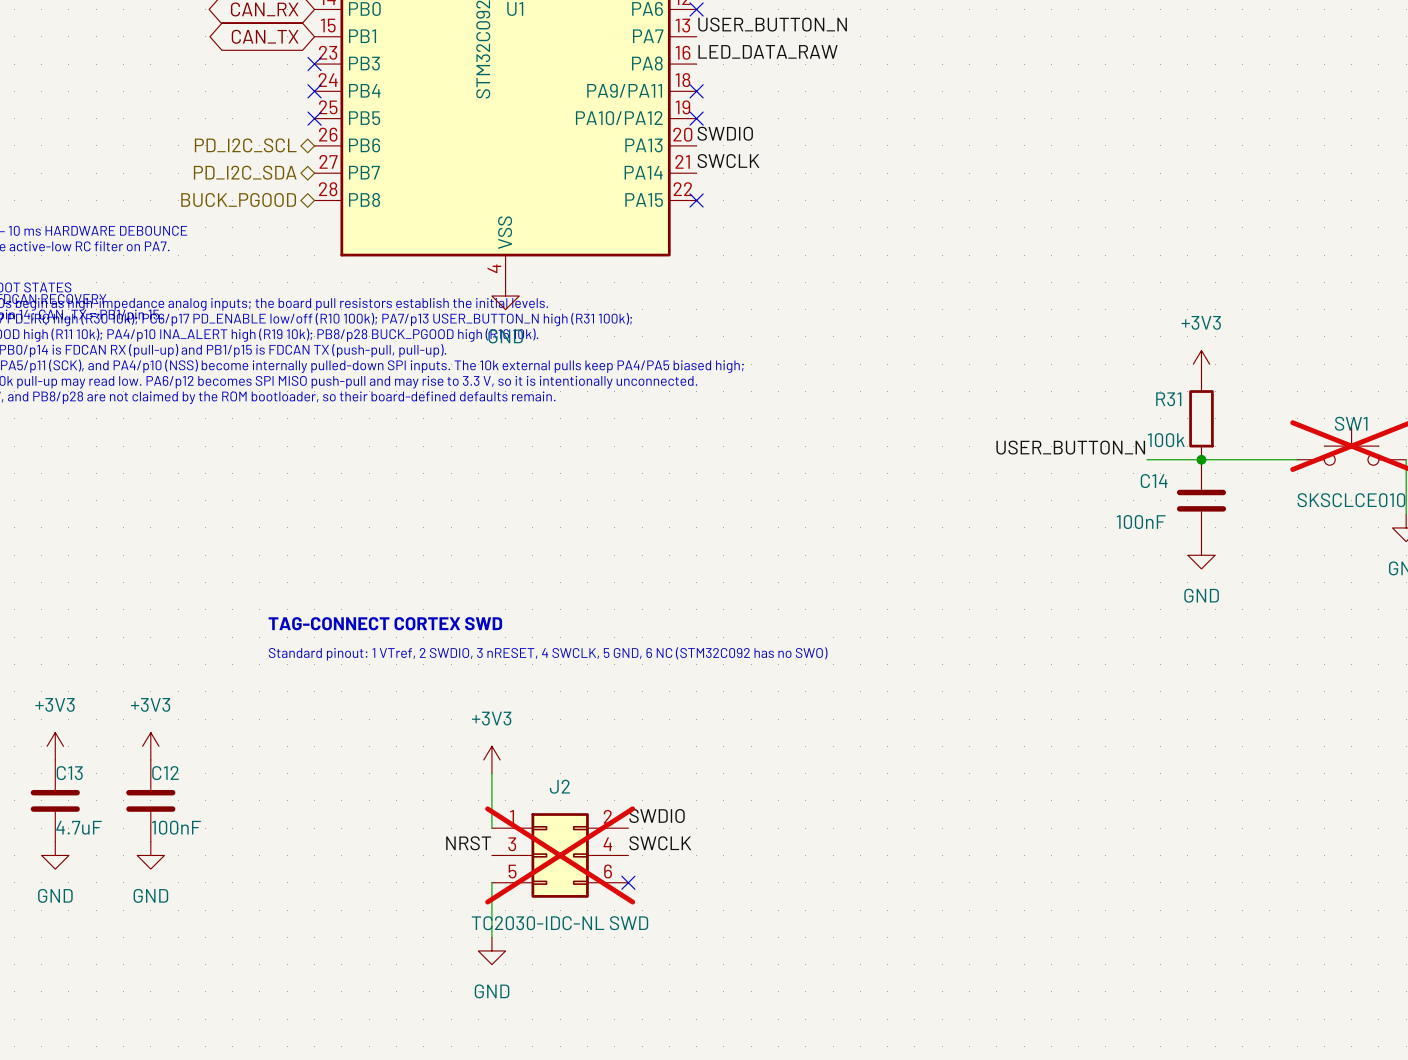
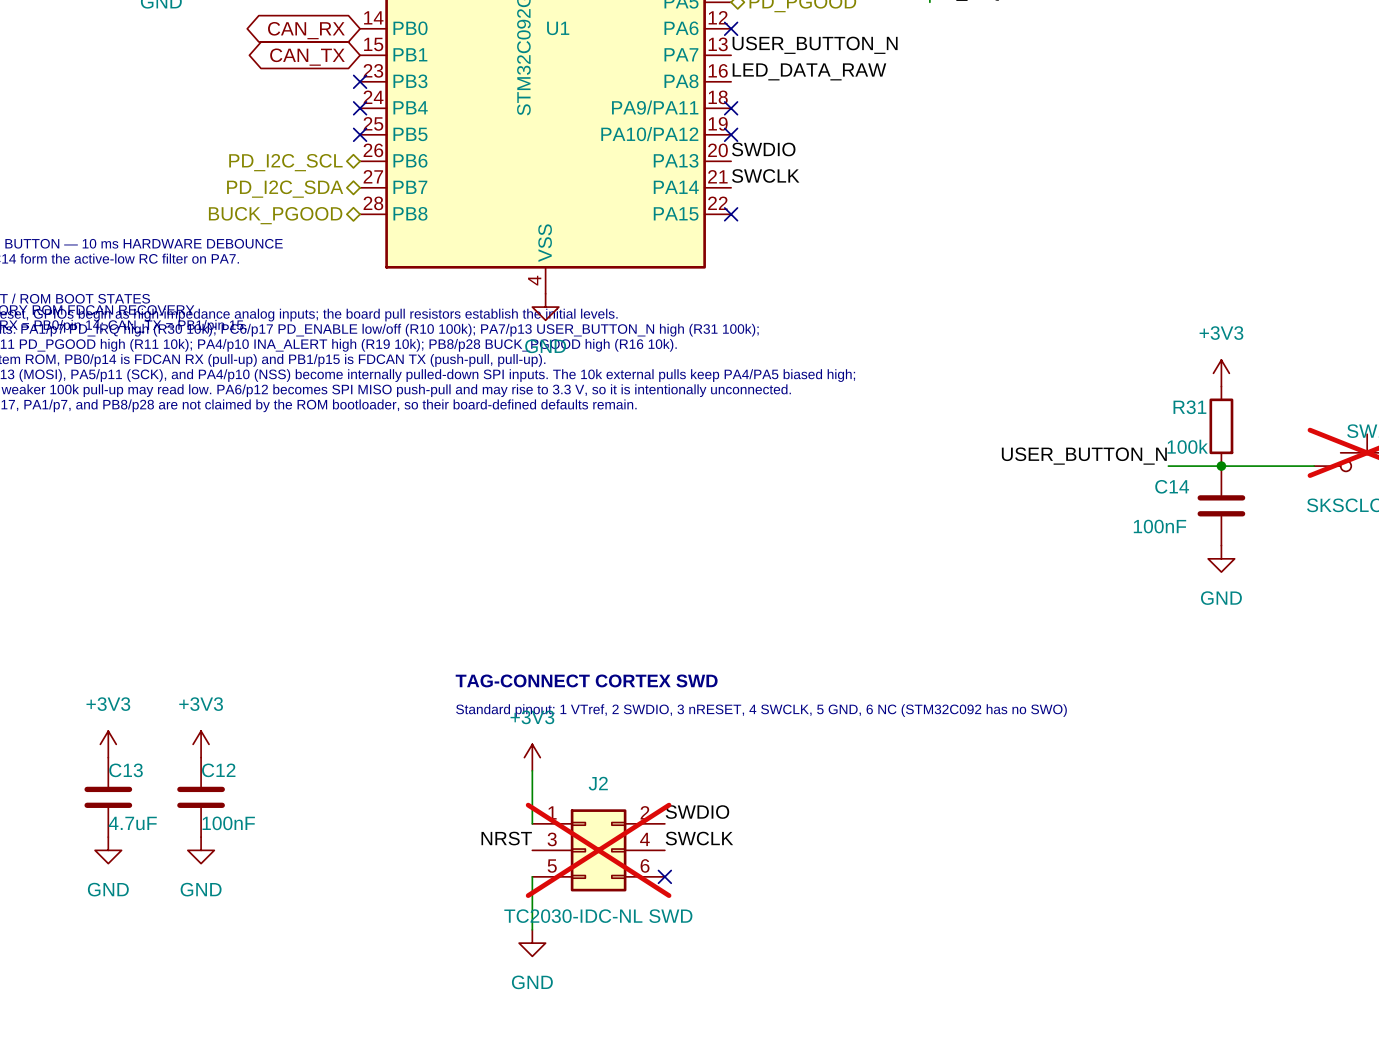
text position: TAG-CONNECT CORTEX SWD (385, 623) -> TAG-CONNECT CORTEX SWD (586, 680)
text position: Standard pinout: 1 VTref, 2 SWDIO, 3 nRESET, 4 SWCLK, 5 GND, 6 NC (STM32C092 has no SWO) (548, 653) -> Standard pinout: 1 VTref, 2 SWDIO, 3 nRESET, 4 SWCLK, 5 GND, 6 NC (STM32C092 has no SWO) (761, 710)

